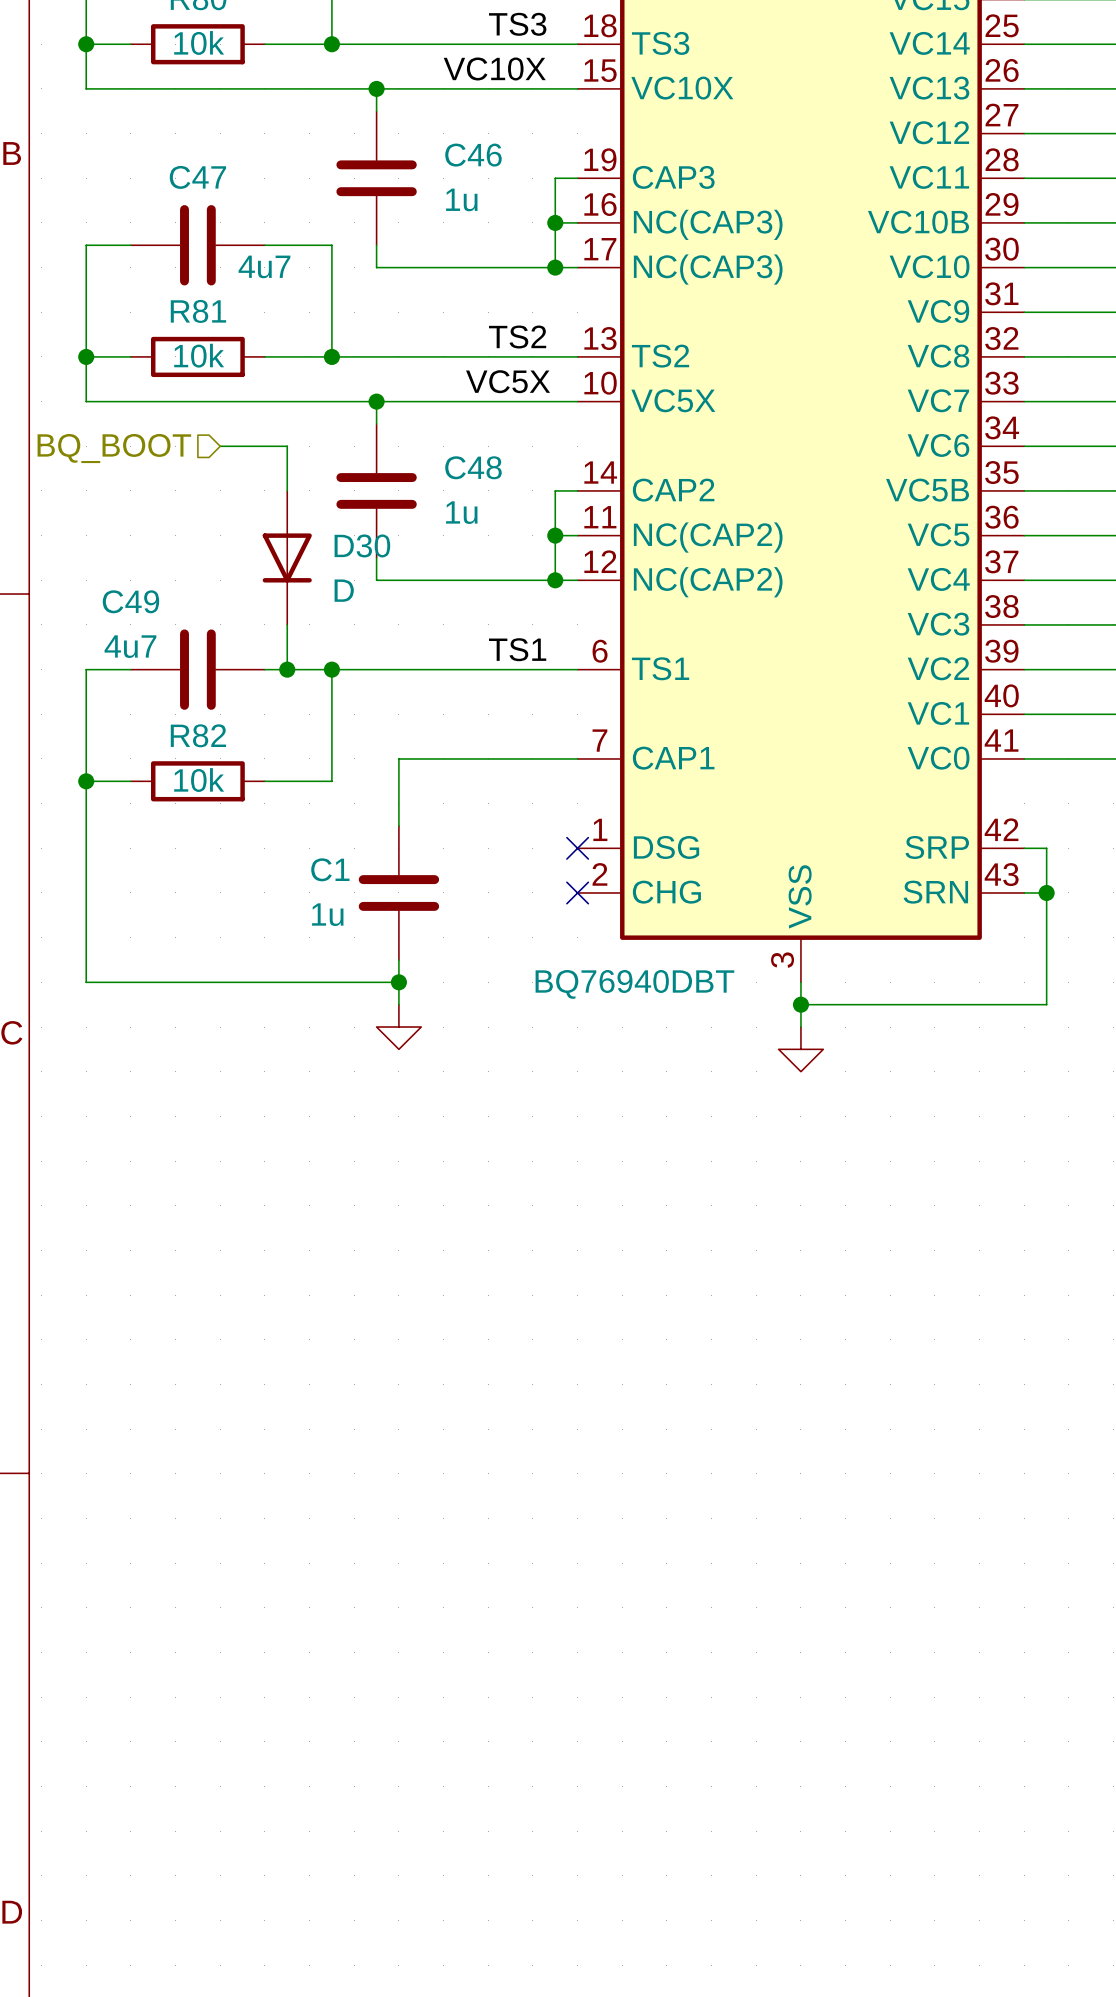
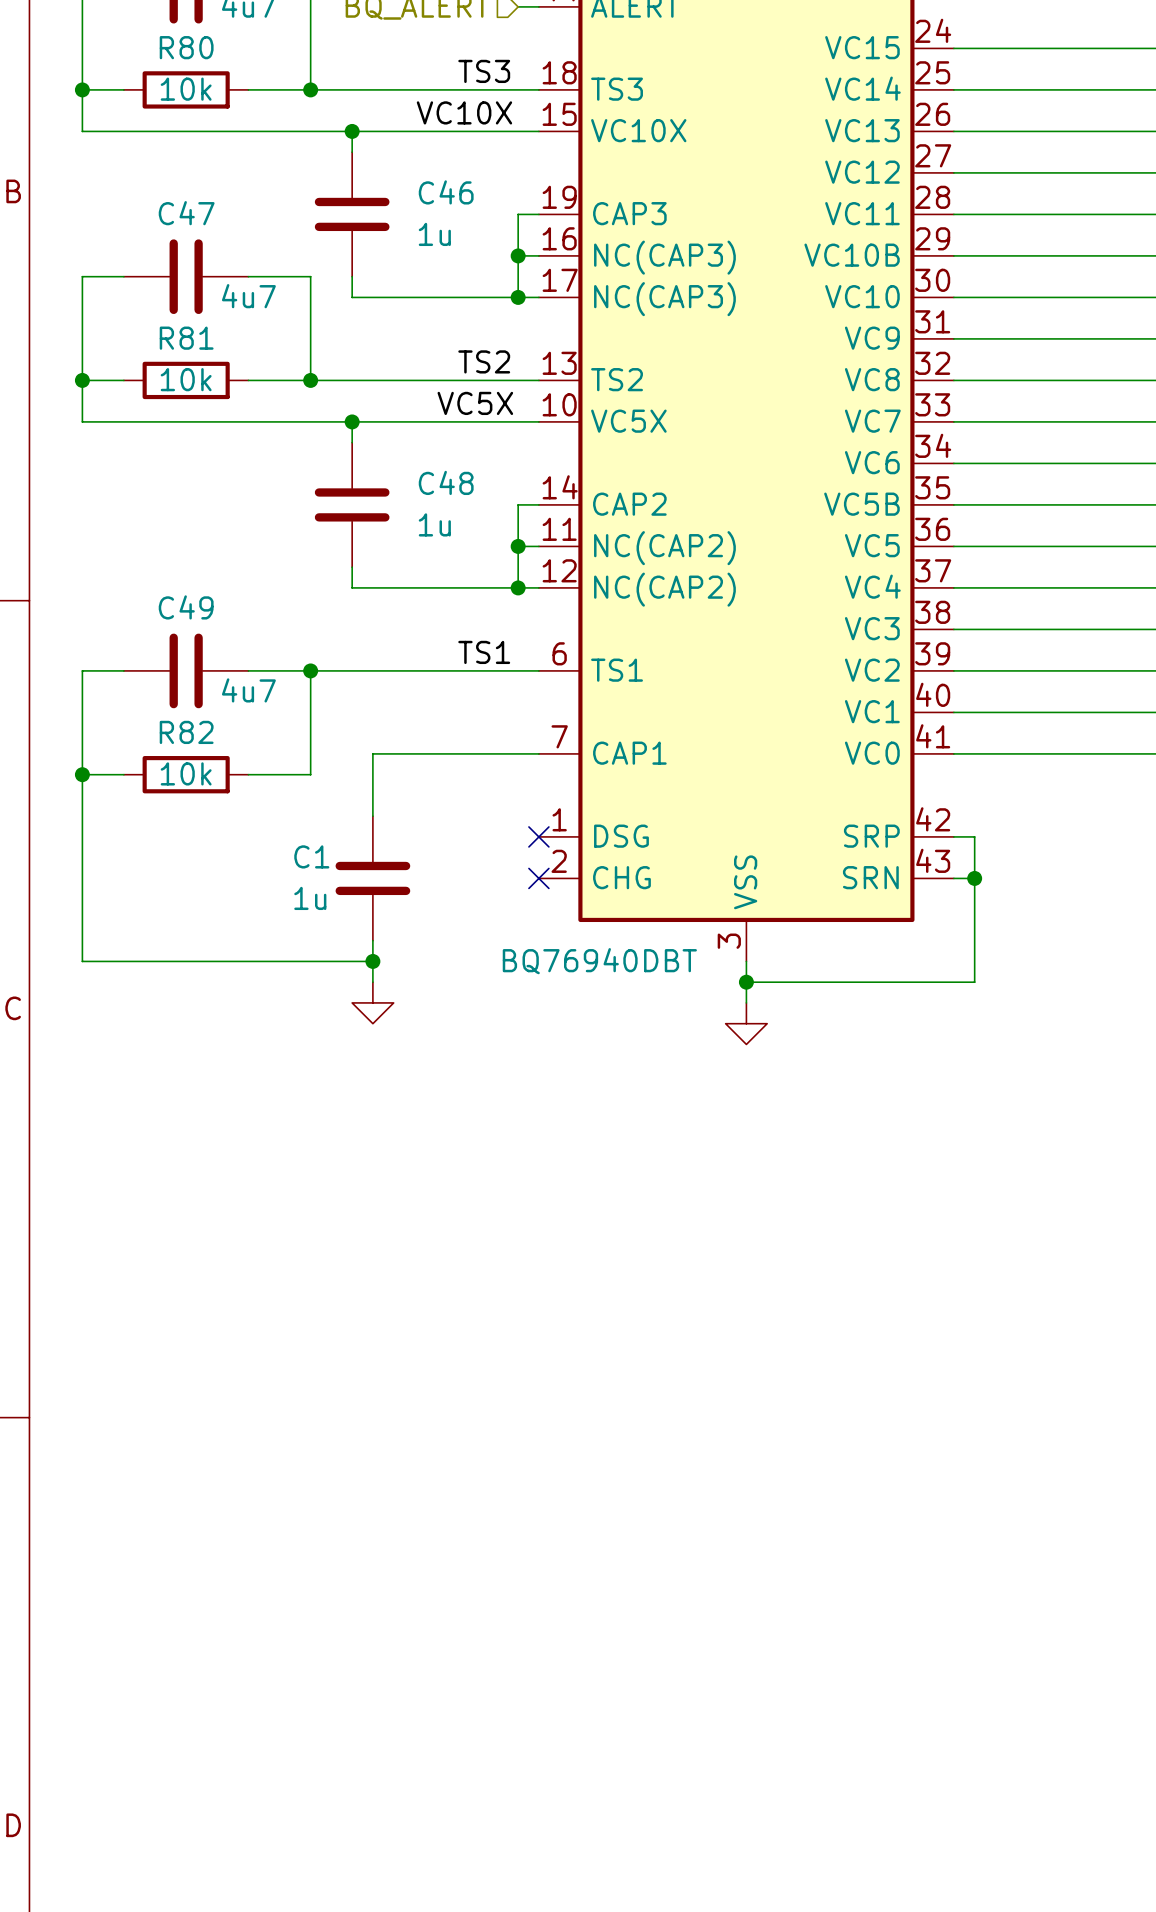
wire: (220, 446) (287, 446) (287, 490) -> none
hierarchical label: BQ_BOOT (114, 448) -> none
D30: D (287, 557) -> none
C49 name position: C49 (130, 601) -> C49 (186, 607)
wire: (287, 624) (287, 669) -> none
C49 value position: 4u7 (130, 646) -> 4u7 (248, 690)
junction: (287, 669) -> none

